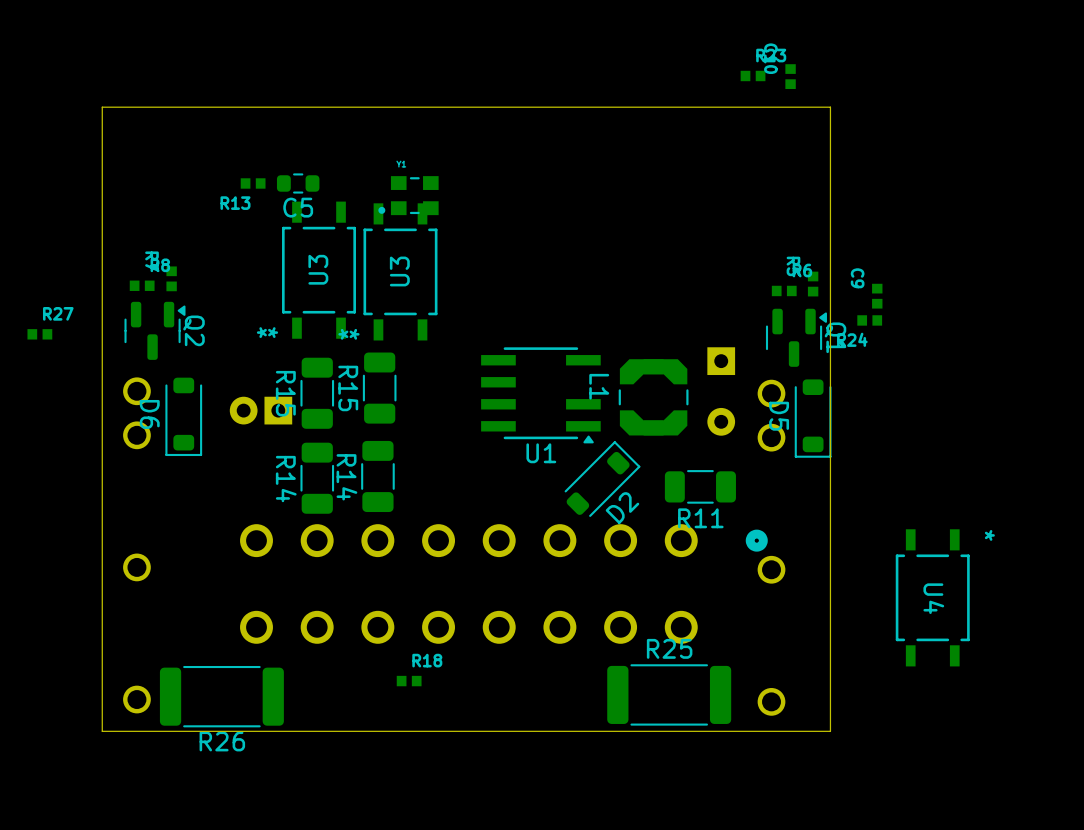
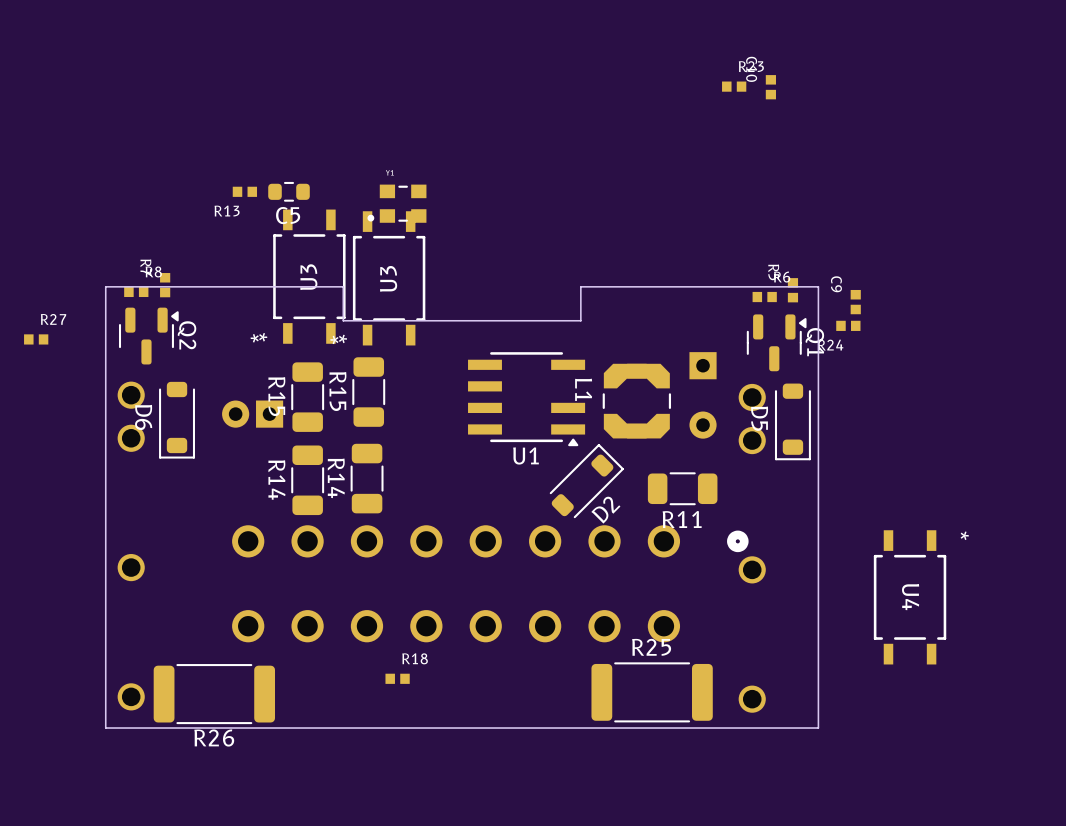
board edge: (830, 731) (830, 107) (102, 107) (102, 731) (110, 731) -> (809, 728) (818, 728) (818, 286) (580, 286) (580, 320) (343, 320) (343, 286) (105, 286) (105, 728)

